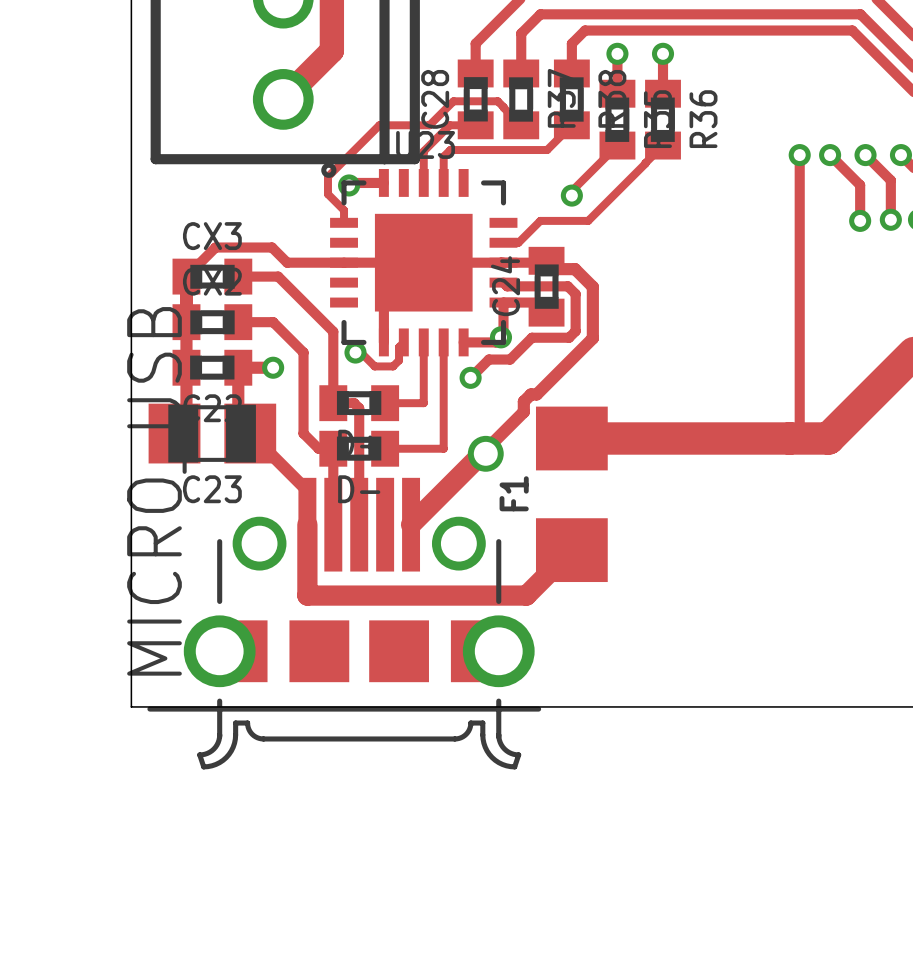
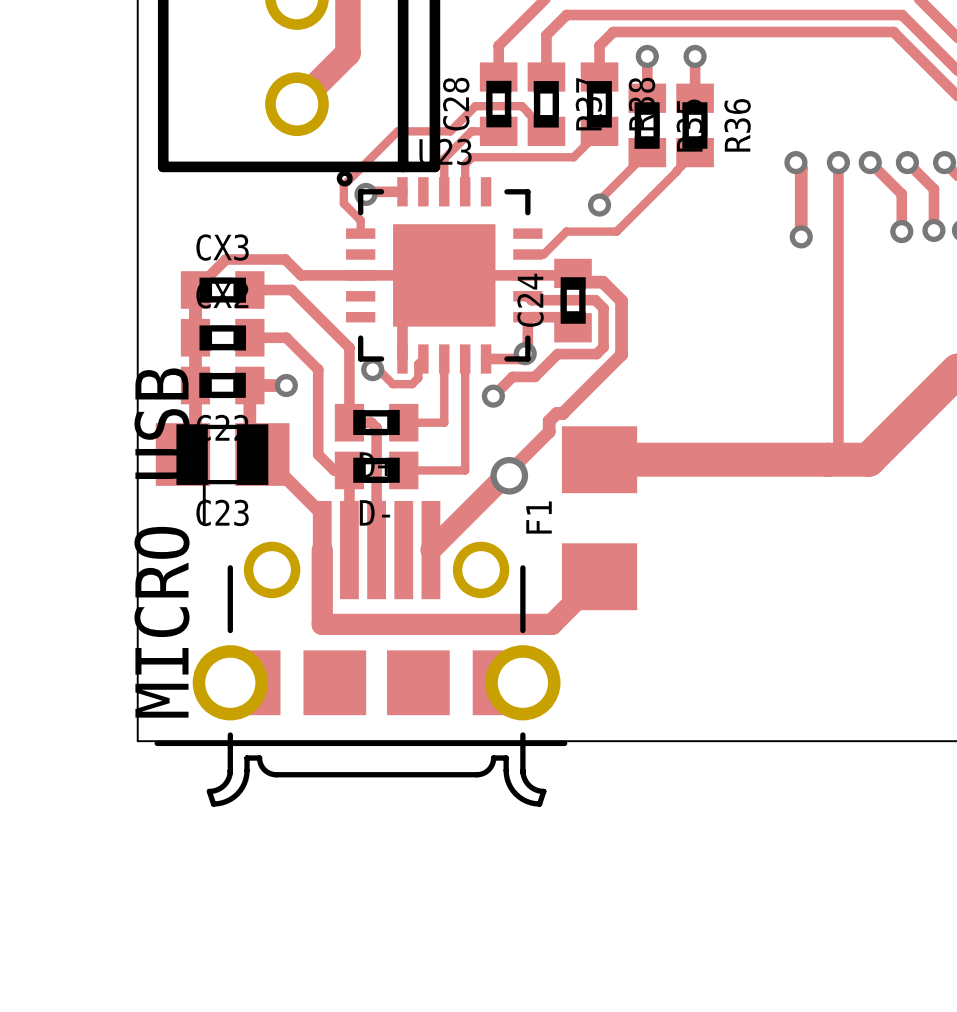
track: none -> (795, 162) (801, 167) (801, 236)
via: none -> (795, 162)
via: none -> (801, 236)

